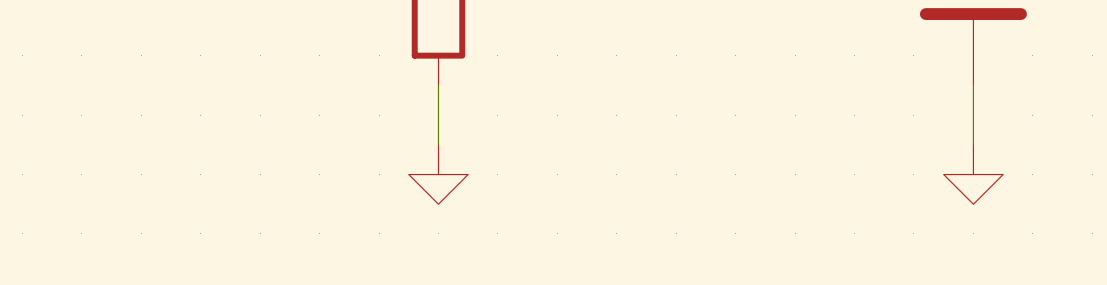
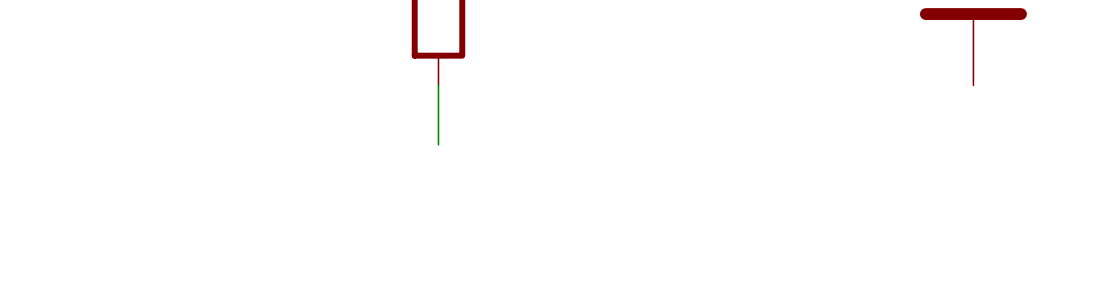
wire: (973, 85) (973, 144) -> none
power symbol: (438, 174) -> none
power symbol: (973, 174) -> none

